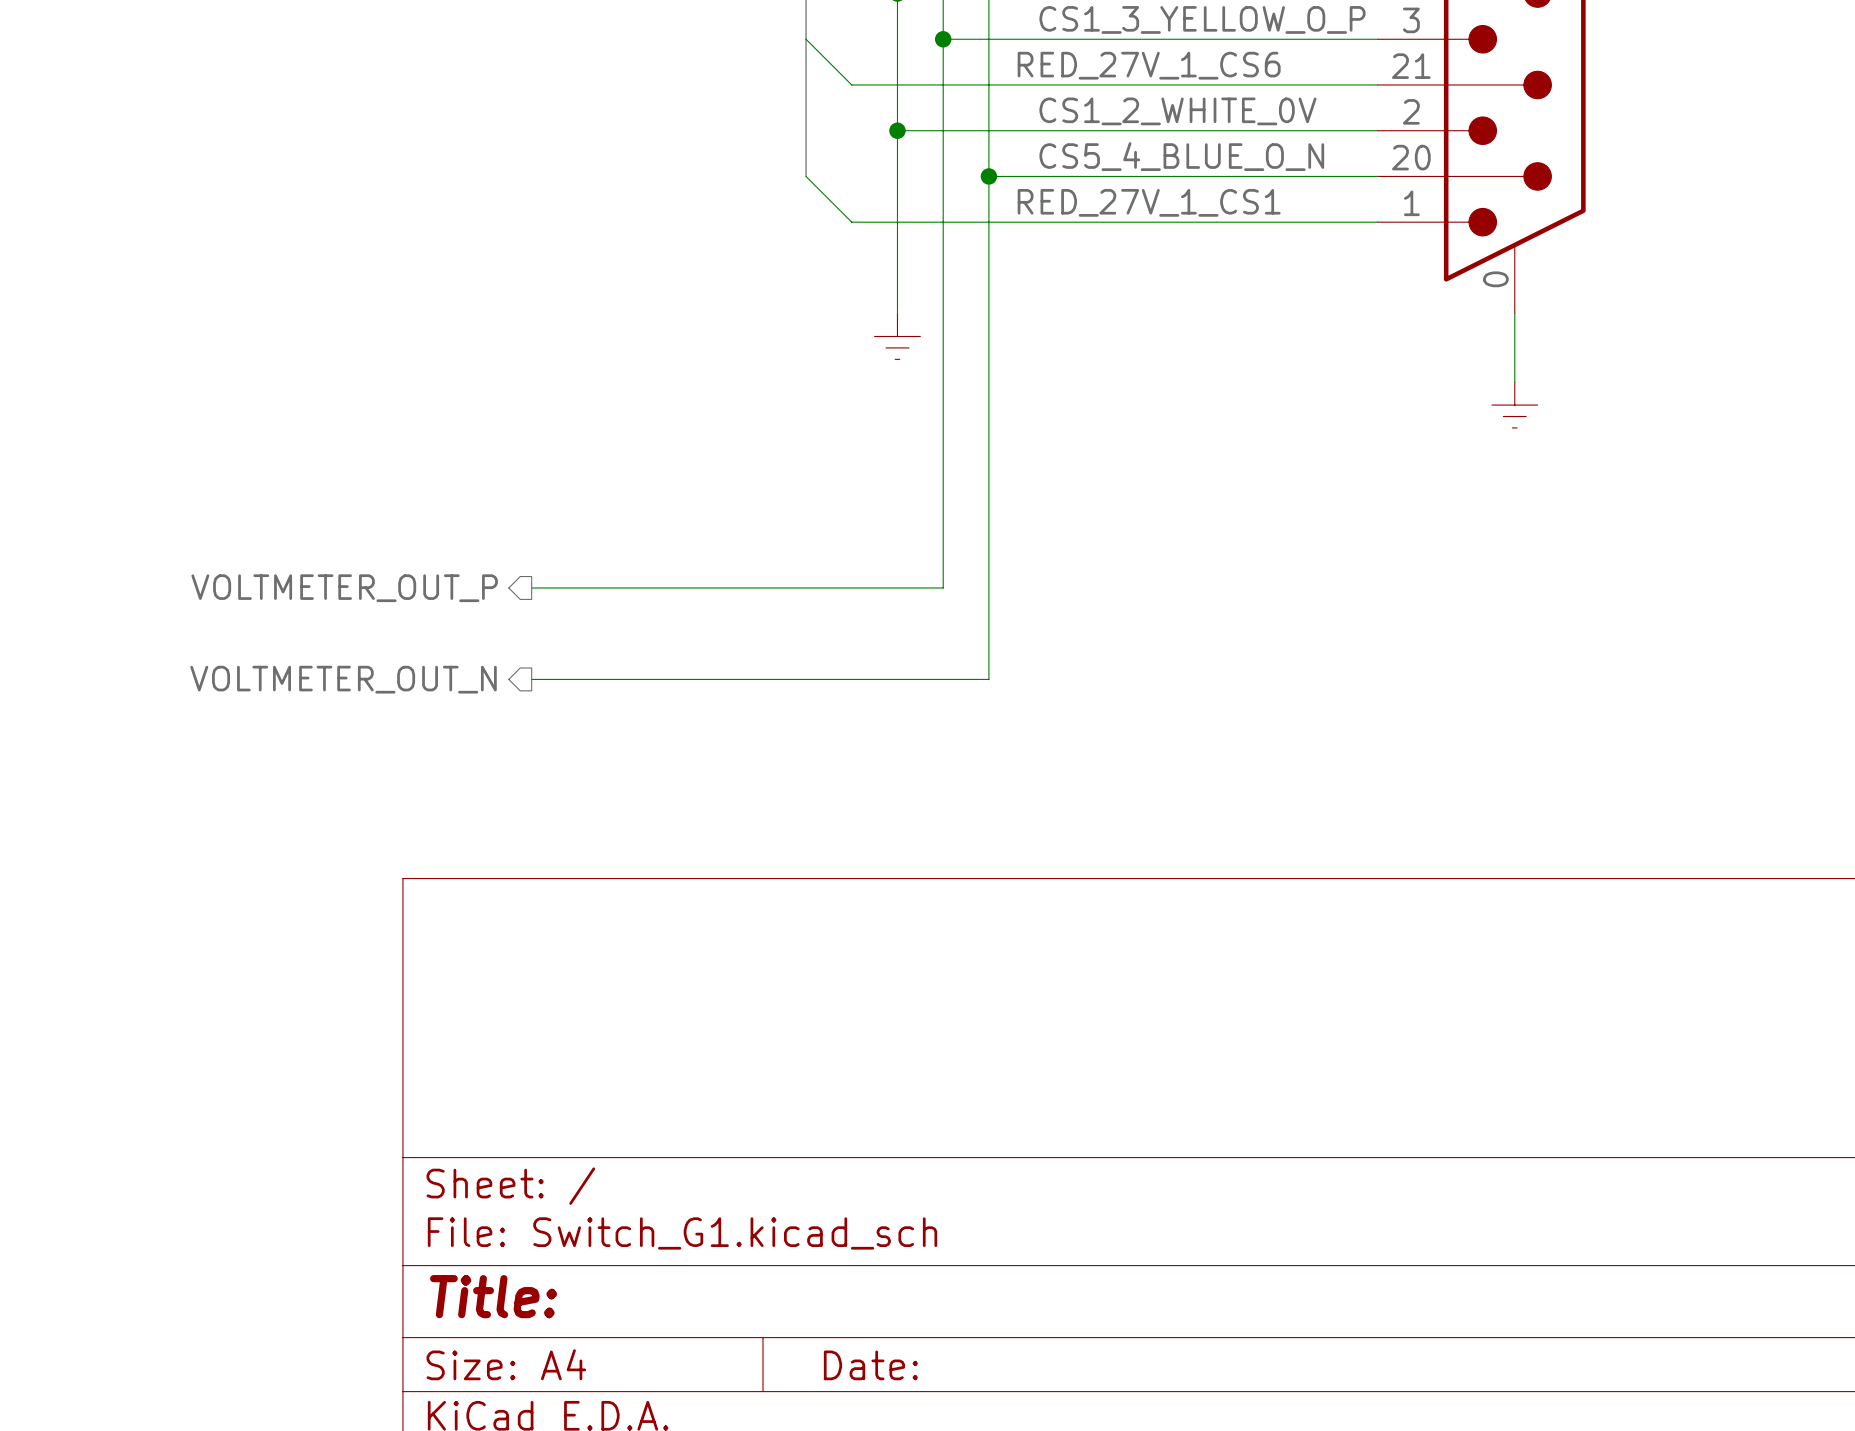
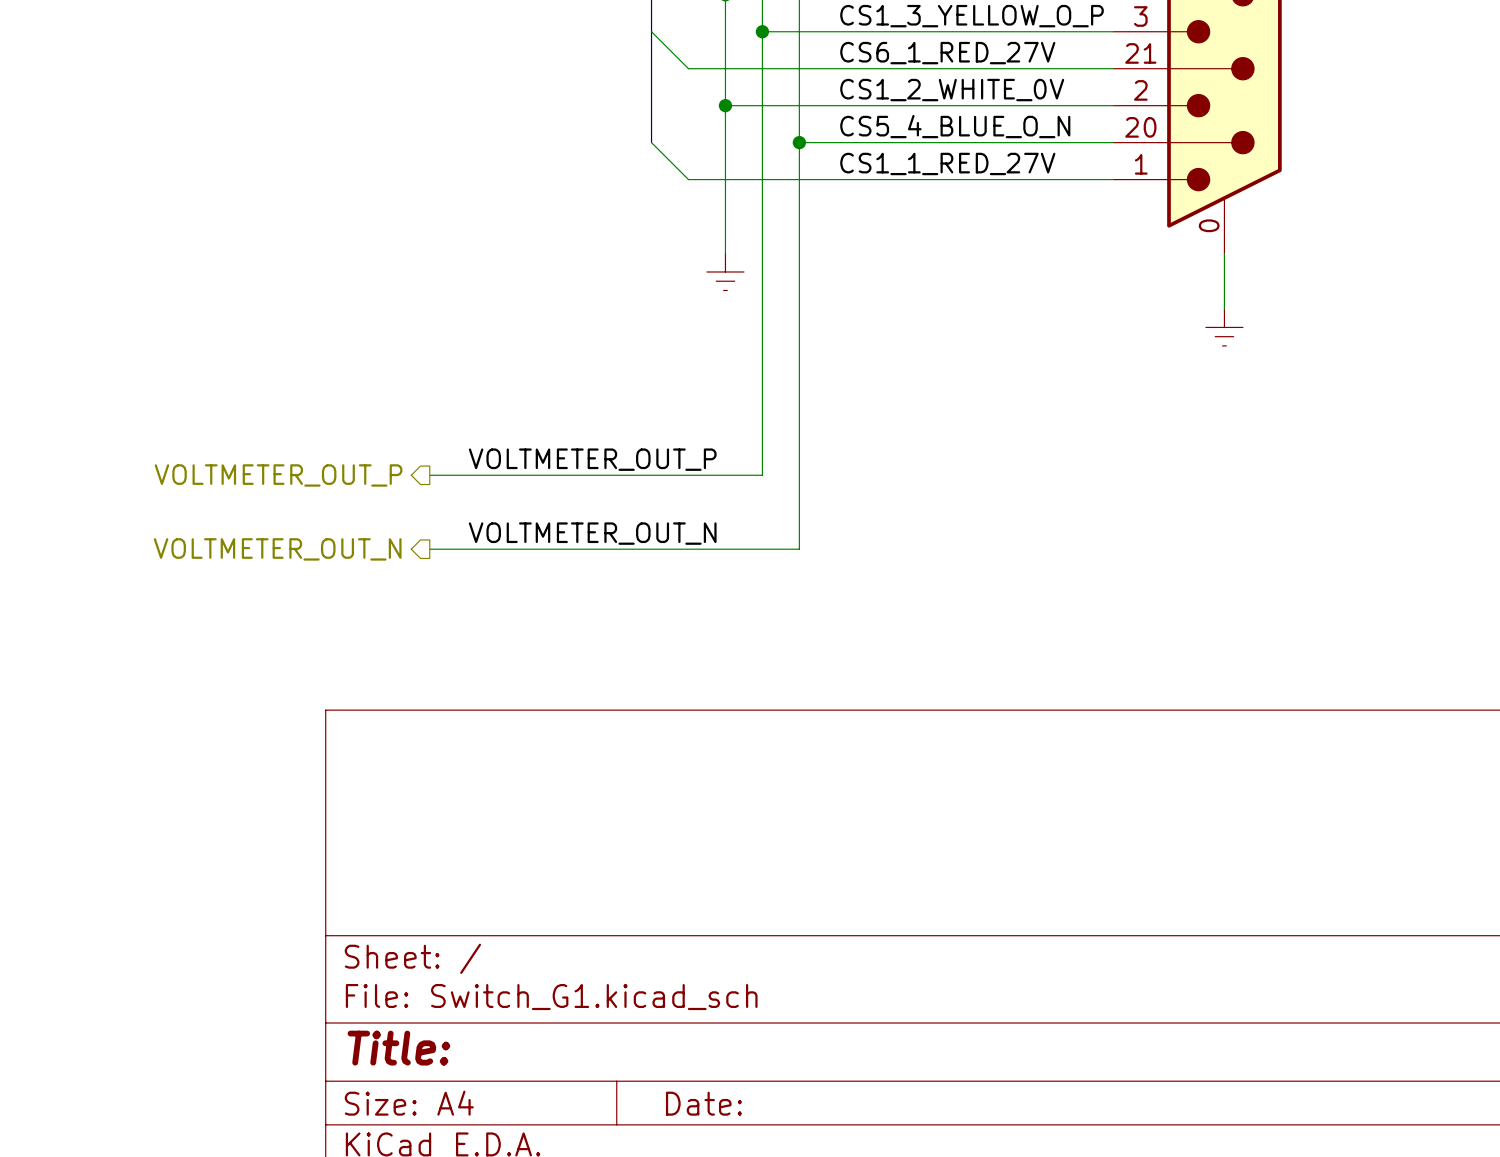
label: RED_27V_1_CS6 (1149, 65) -> none
label: none -> CS6_1_RED_27V (947, 53)
label: RED_27V_1_CS1 (1149, 202) -> none
label: none -> CS1_1_RED_27V (947, 163)
label: none -> VOLTMETER_OUT_P (592, 459)
label: none -> VOLTMETER_OUT_N (592, 533)

